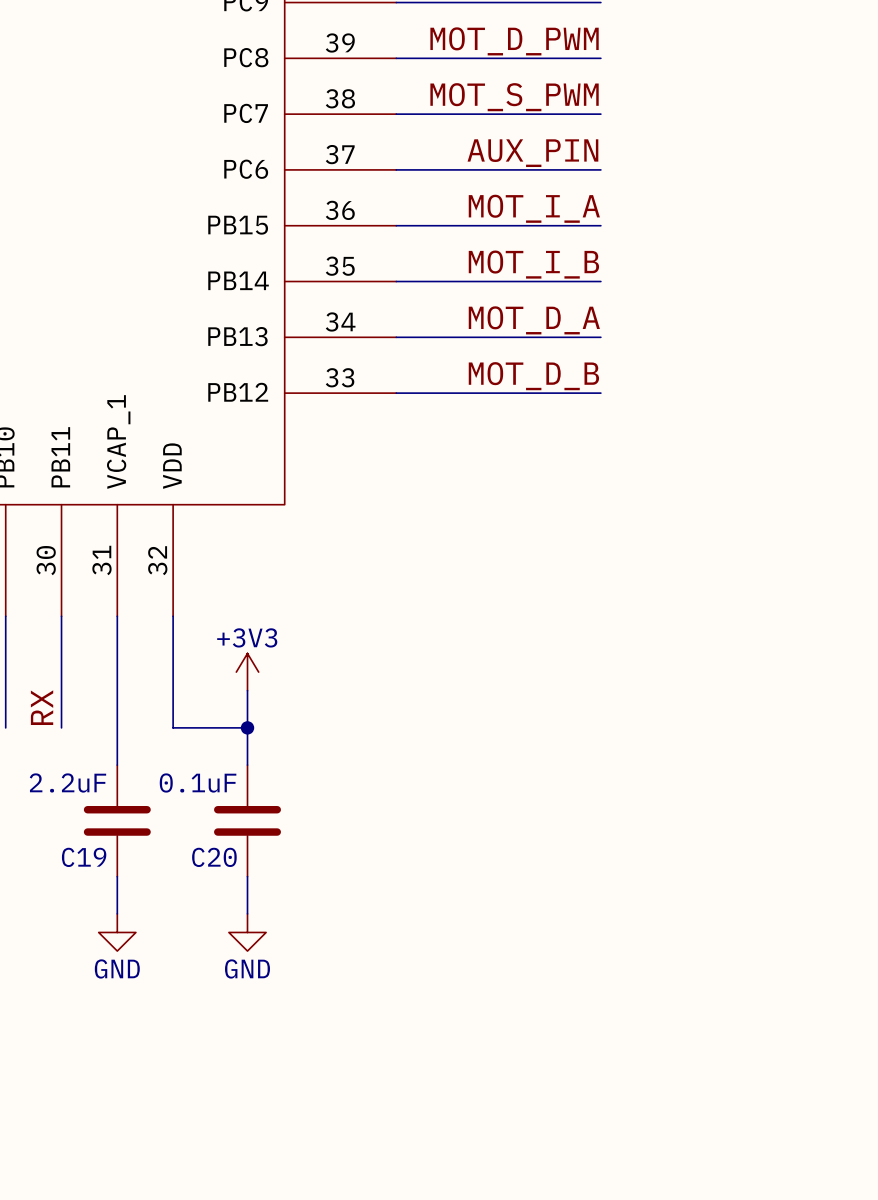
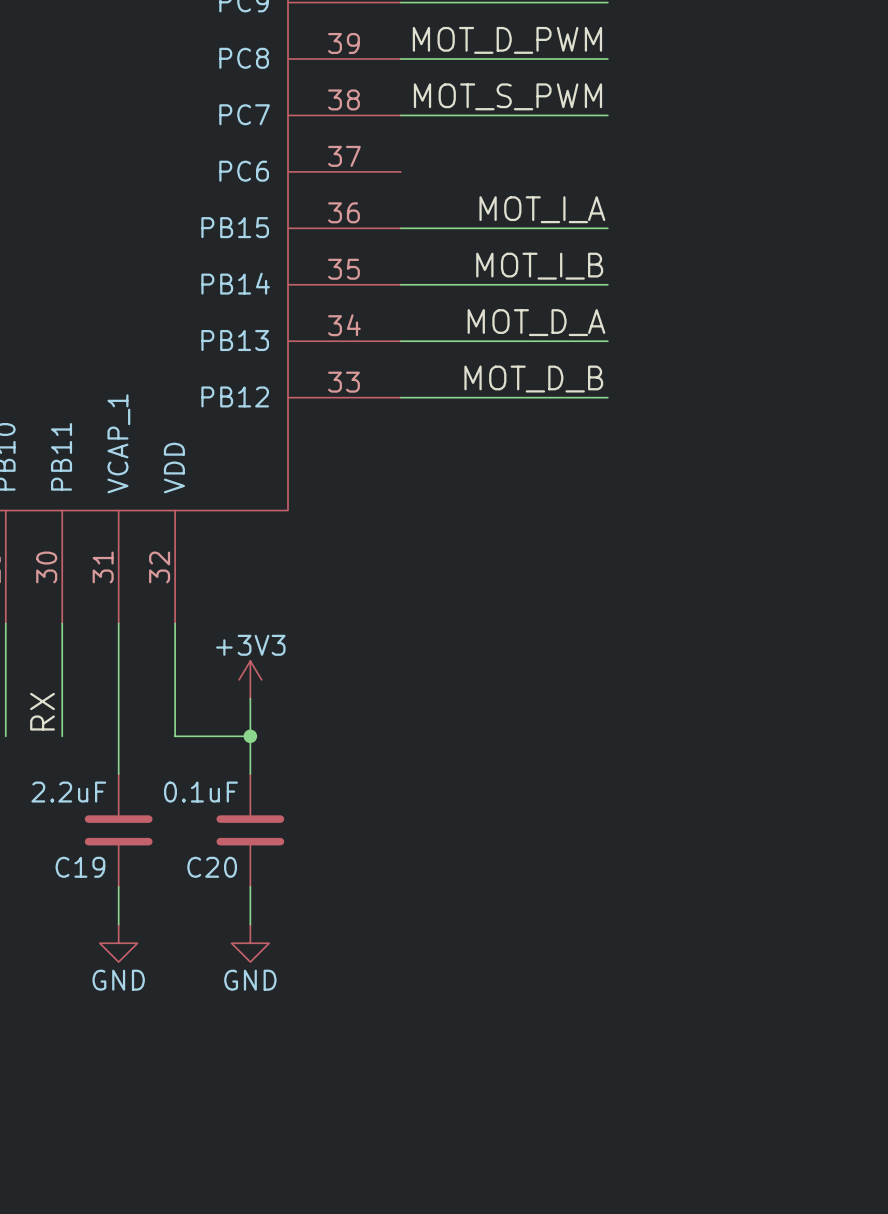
label: AUX_PIN (532, 153) -> none
wire: (396, 169) (600, 169) -> none

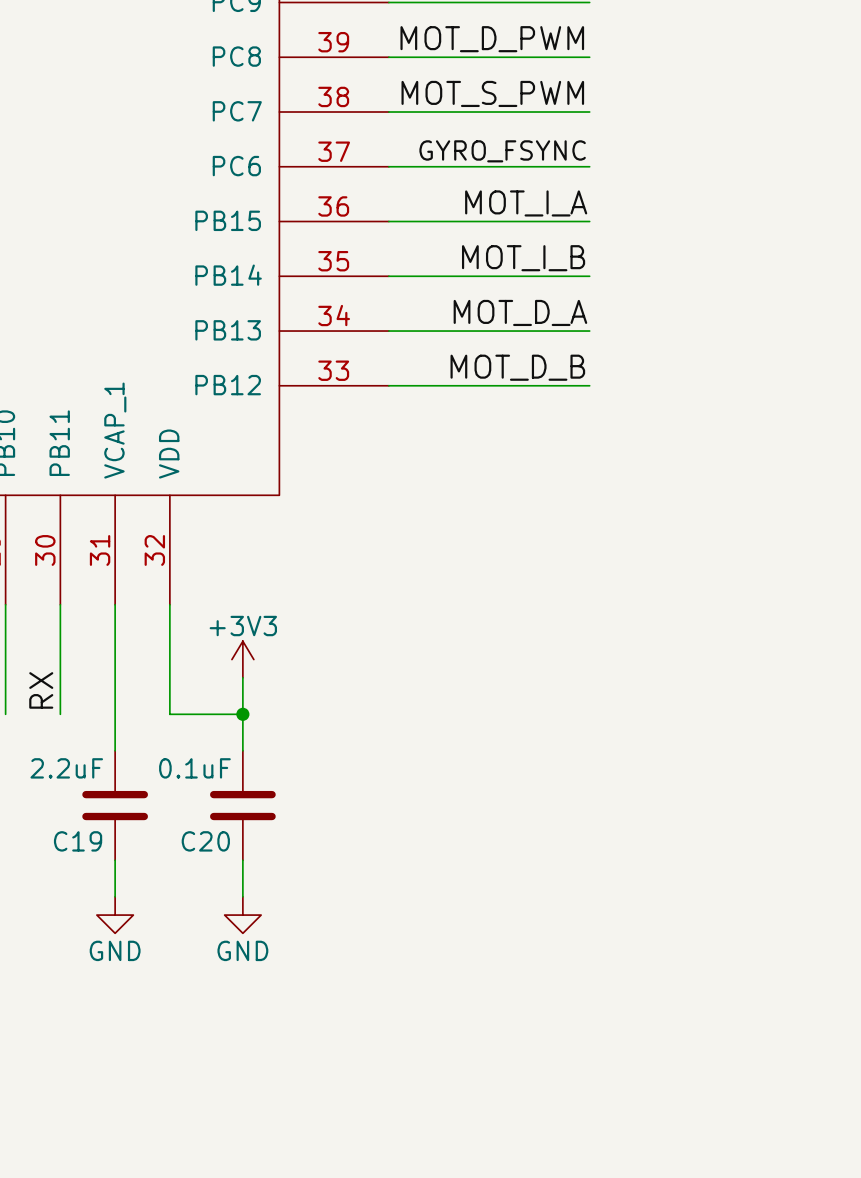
label: none -> GYRO_FSYNC (502, 151)
wire: none -> (388, 166) (589, 166)

